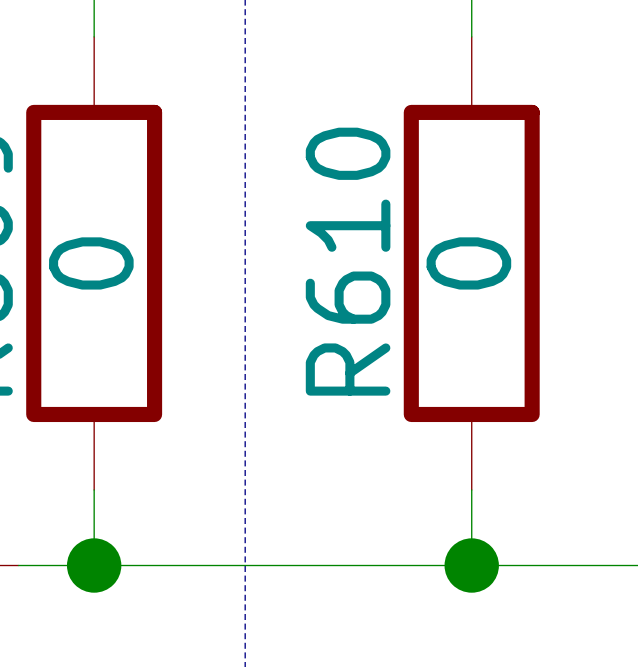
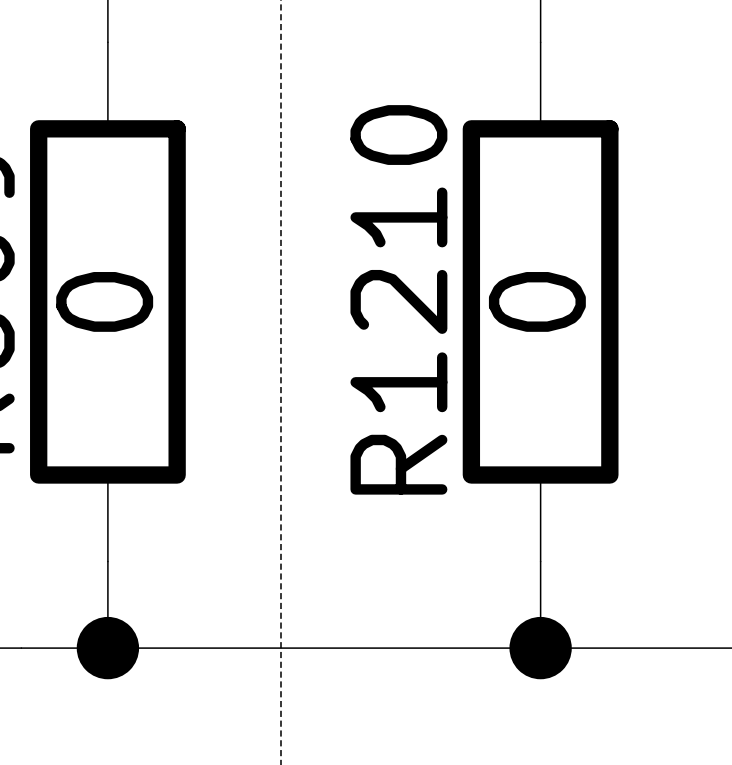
R610 name: R610 (348, 261) -> R1210 (398, 299)

